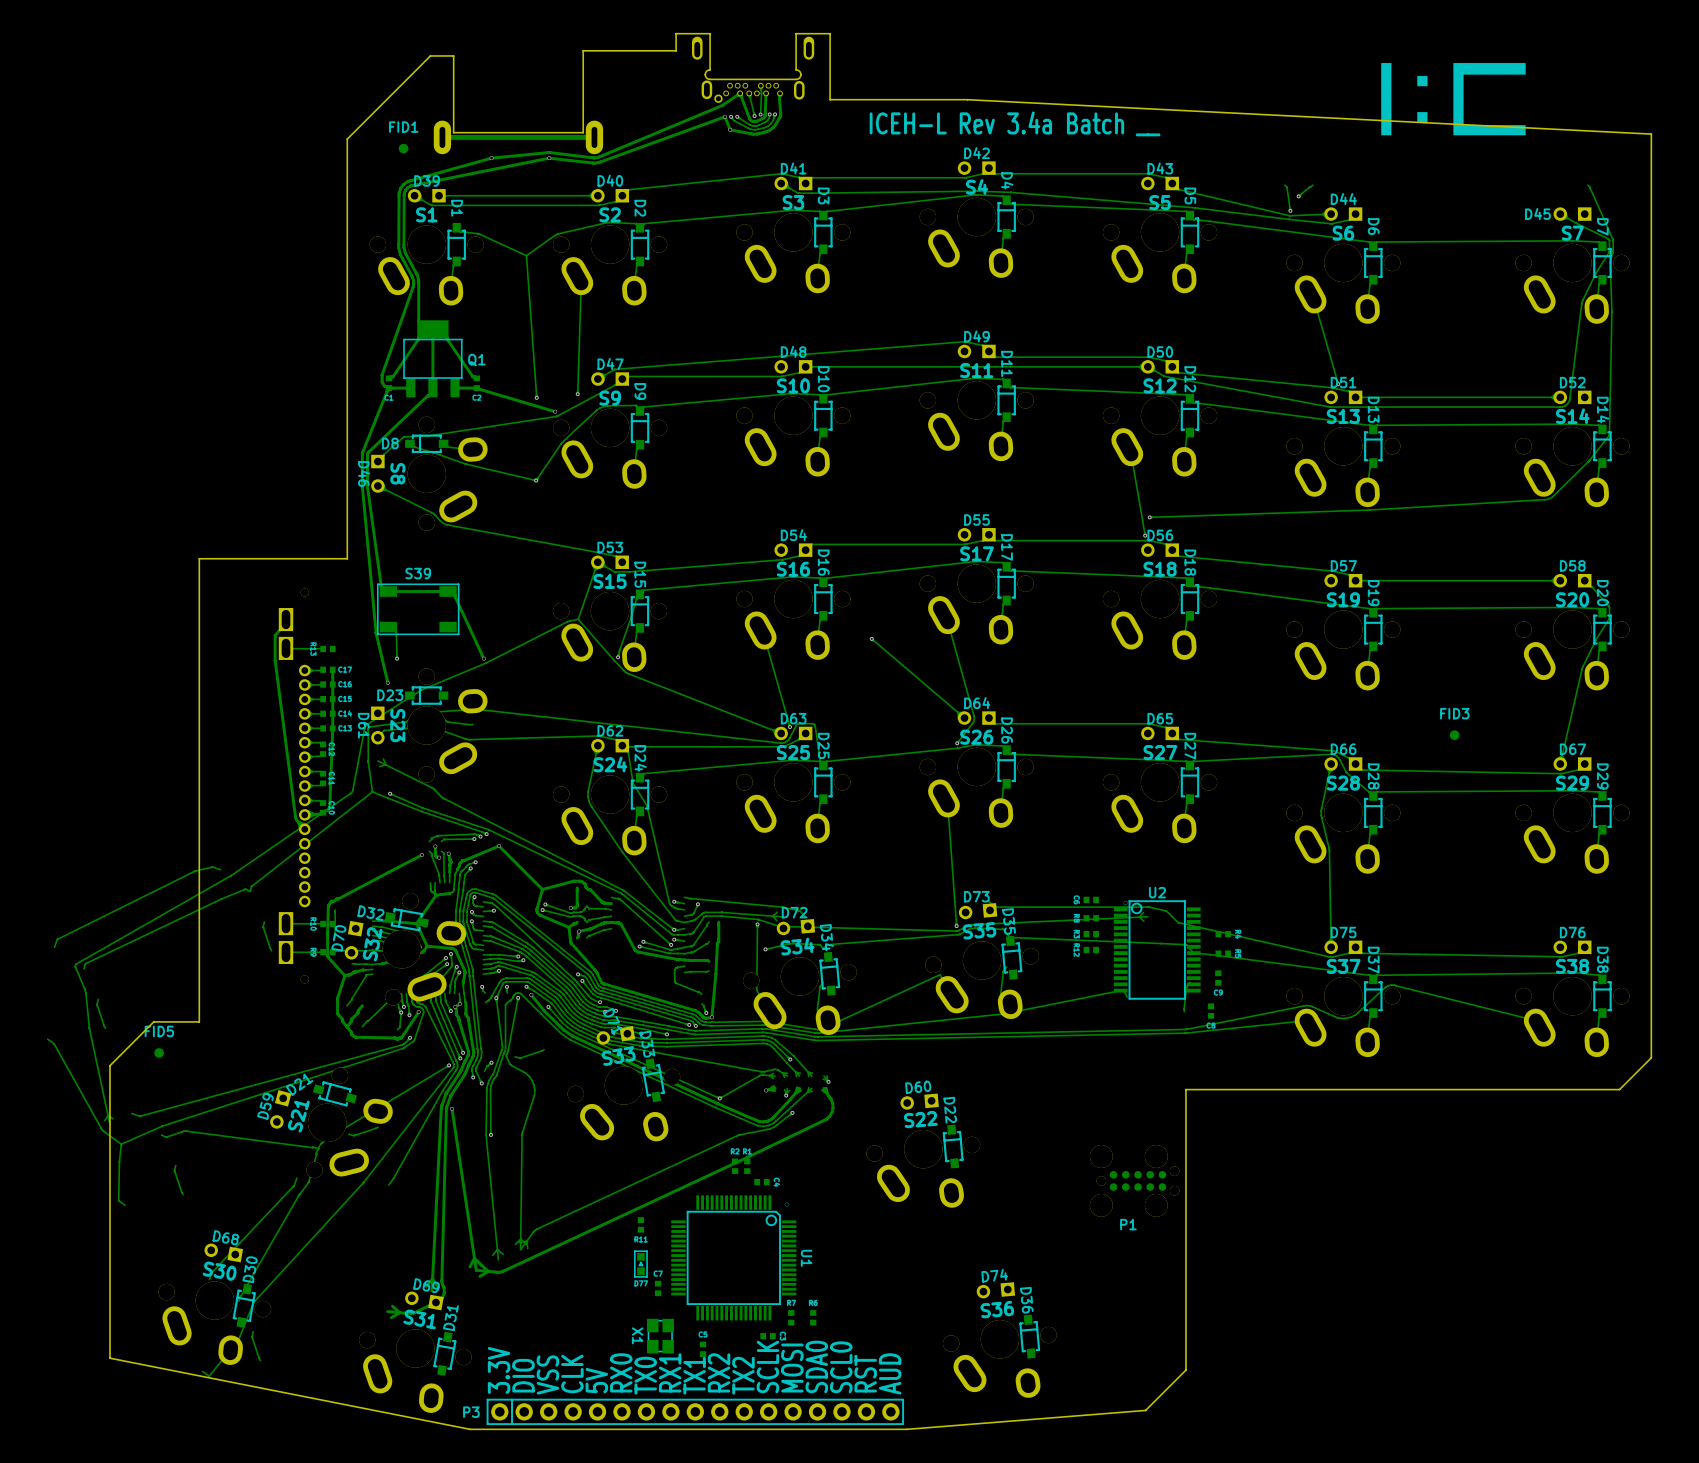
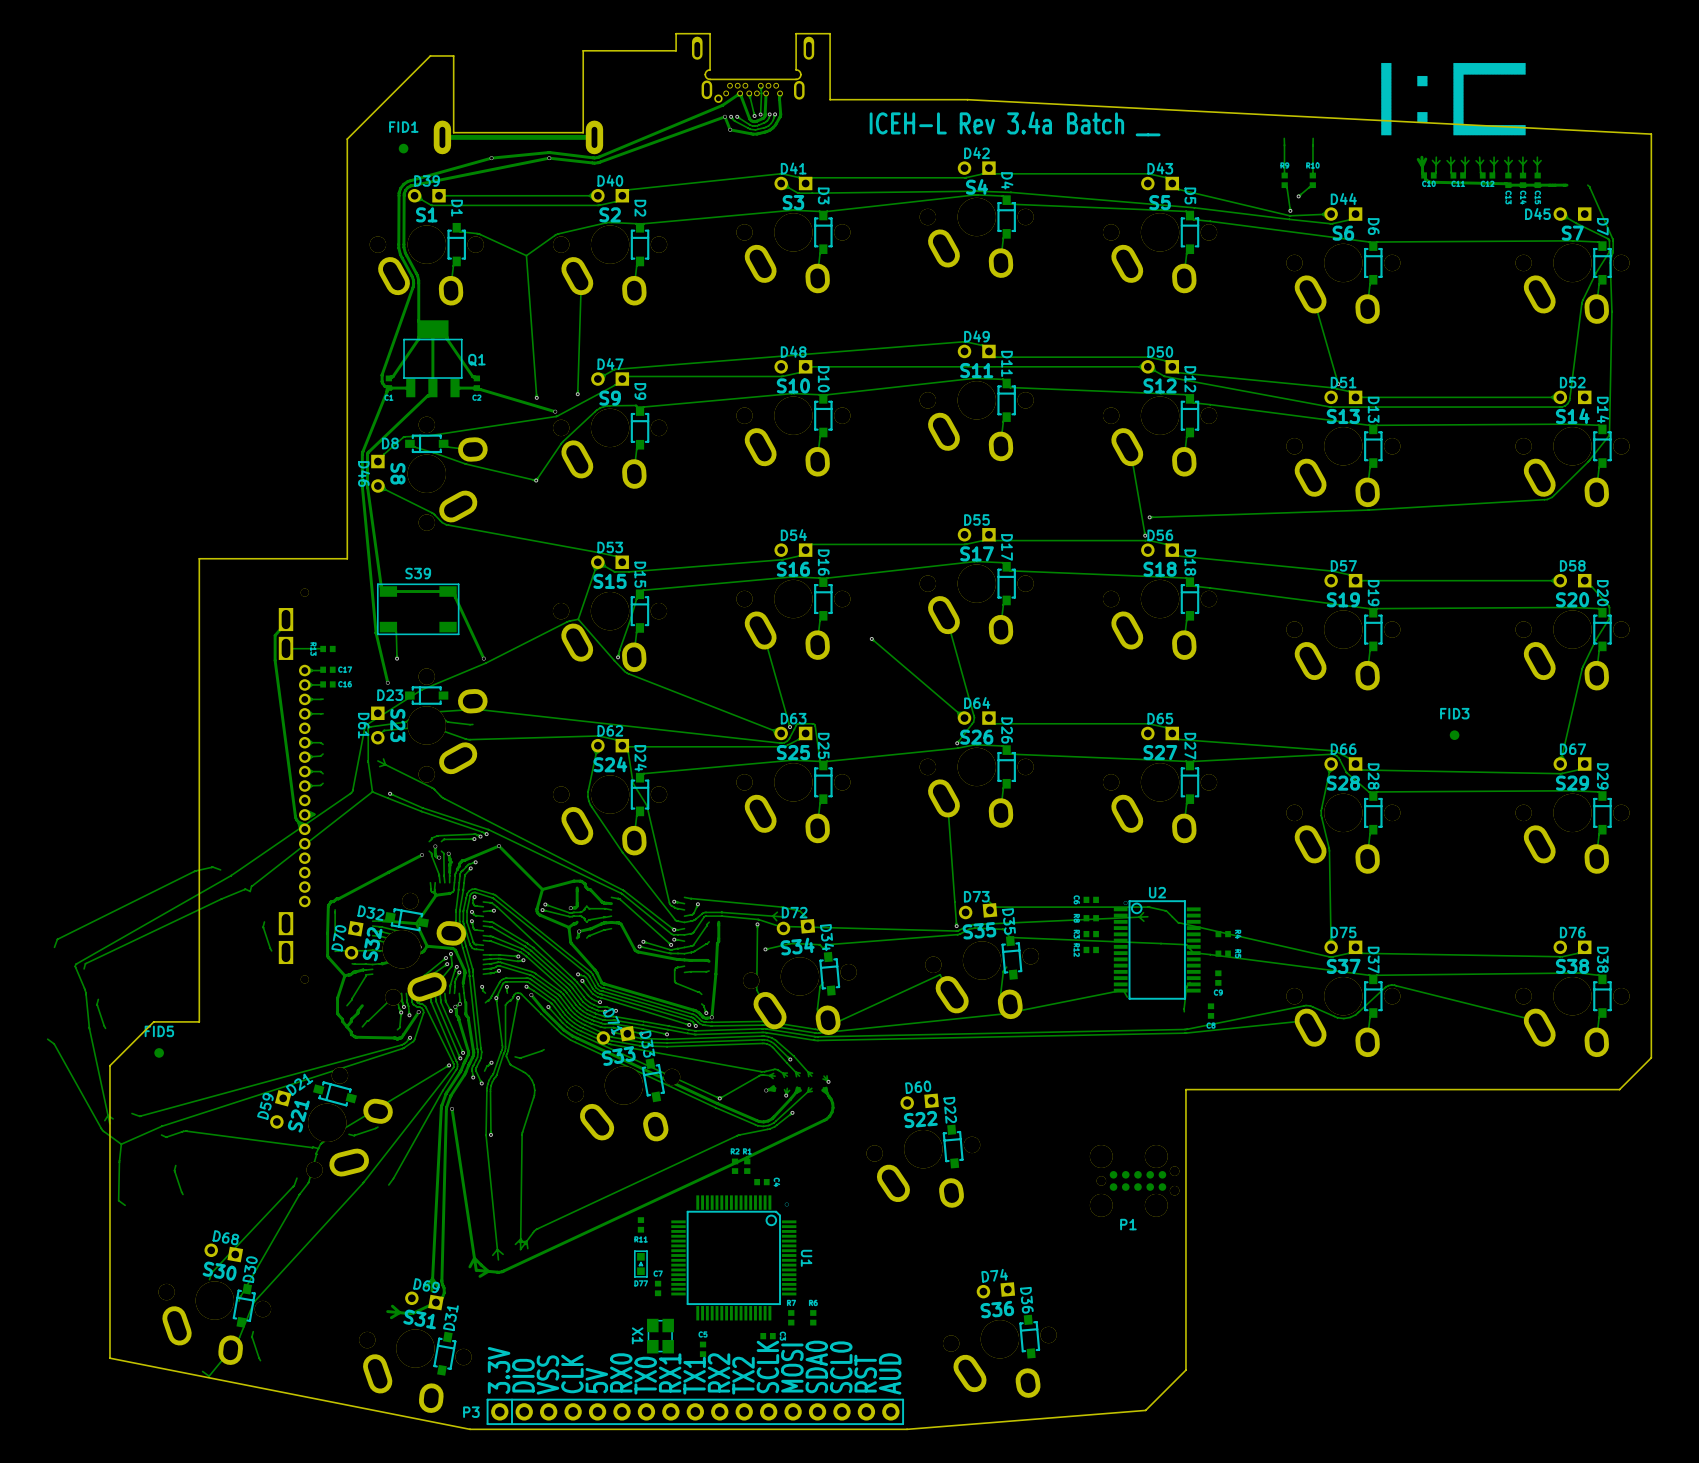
track: none -> (1284, 138) (1284, 175)
track: none -> (1313, 138) (1312, 172)
track: none -> (1421, 157) (1422, 172)
track: none -> (1436, 157) (1435, 173) (1433, 175)
track: none -> (1450, 157) (1451, 173) (1453, 175)
track: none -> (1465, 157) (1465, 173) (1463, 175)
track: none -> (1479, 157) (1480, 172)
track: none -> (1494, 157) (1492, 175)
track: none -> (1508, 157) (1508, 175)
track: none -> (1522, 157) (1523, 175)
track: none -> (1537, 157) (1537, 175)
track: none -> (1425, 158) (1422, 166) (1418, 159)
track: none -> (1432, 160) (1436, 164) (1439, 160)
track: none -> (1454, 160) (1451, 164) (1447, 160)
track: none -> (1468, 160) (1465, 164) (1461, 160)
track: none -> (1483, 160) (1480, 164) (1476, 160)
track: none -> (1497, 160) (1494, 164) (1490, 160)
track: none -> (1512, 160) (1508, 164) (1504, 160)
track: none -> (1526, 160) (1522, 164) (1519, 160)
track: none -> (1541, 160) (1537, 164) (1533, 160)
track: none -> (1422, 172) (1425, 179) (1430, 182) (1567, 185)
track: (332, 669) (329, 807) (321, 814) (304, 814) -> none
part rotation: 0° (327, 699) -> 90° clockwise (1537, 180)
part position: (327, 699) -> (1537, 180)
part rotation: 0° (327, 713) -> 90° clockwise (1523, 180)
part position: (327, 713) -> (1523, 180)
track: (308, 724) (312, 728) (308, 732) -> none
track: (304, 728) (323, 728) -> none
part rotation: 0° (327, 728) -> 90° clockwise (1508, 180)
part position: (327, 728) -> (1508, 180)
part rotation: 0° (323, 749) -> 90° clockwise (1487, 175)
part position: (323, 749) -> (1487, 175)
part rotation: 0° (323, 778) -> 90° clockwise (1458, 175)
part position: (323, 778) -> (1458, 175)
track: (308, 796) (312, 800) (308, 804) -> none
track: (304, 800) (320, 800) (323, 803) -> none
part rotation: 0° (323, 807) -> 90° clockwise (1428, 175)
part position: (323, 807) -> (1428, 175)
track: (286, 923) (323, 923) -> none
part rotation: 0° (327, 923) -> 90° clockwise (1312, 180)
part position: (327, 923) -> (1312, 180)
track: (323, 952) (286, 952) -> none
part rotation: 0° (327, 952) -> 90° clockwise (1284, 180)
part position: (327, 952) -> (1284, 180)

